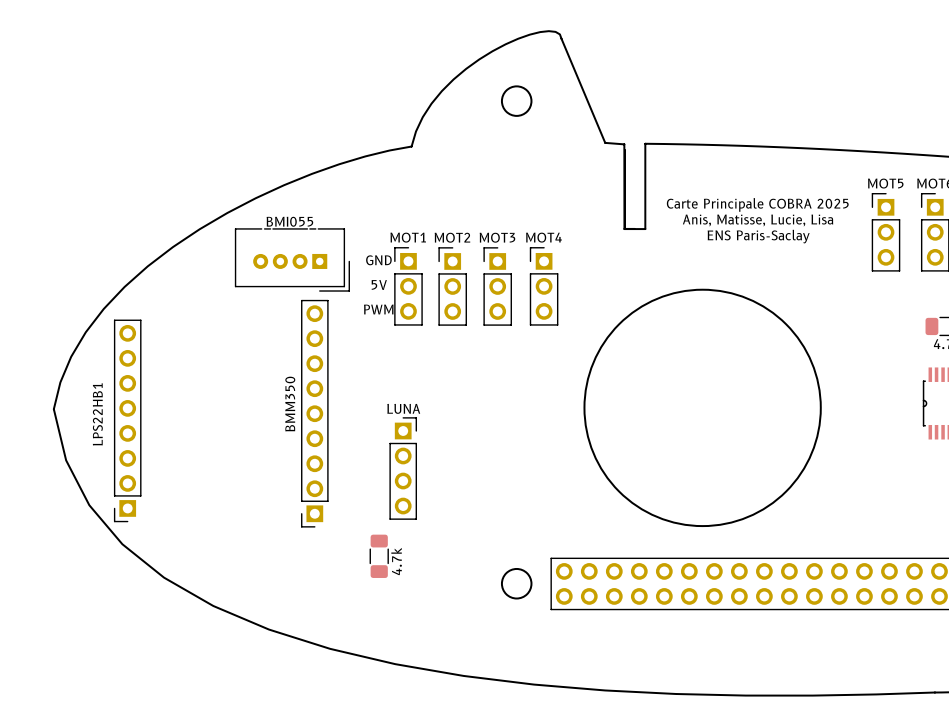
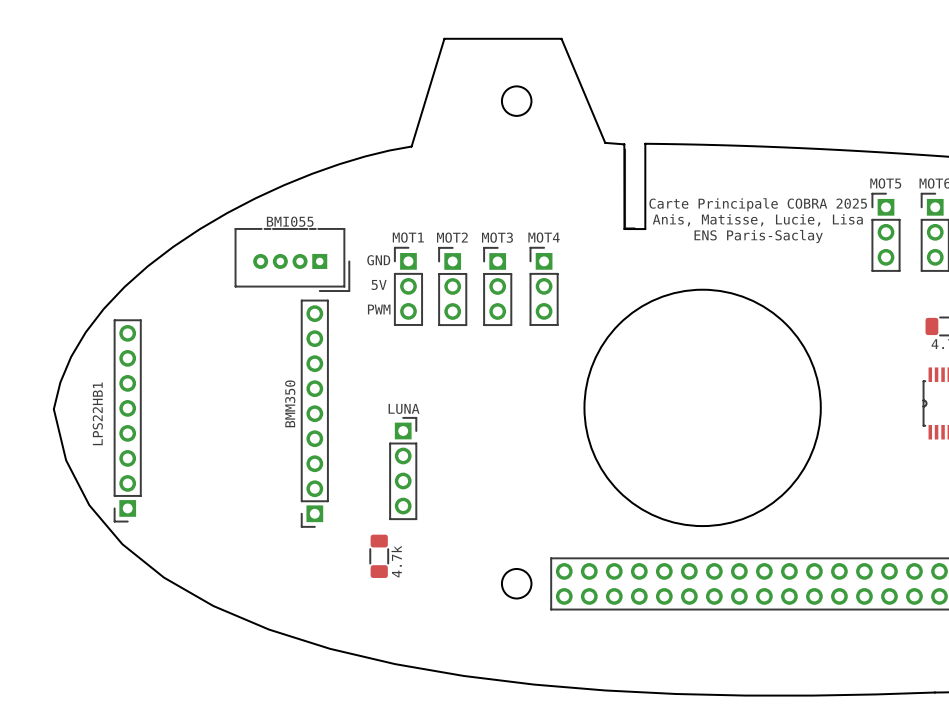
board edge: (561, 38) (559, 34) (555, 31) (529, 34) (505, 44) (479, 59) (453, 79) (431, 103) (416, 131) (411, 146) -> (561, 38) (444, 38) (411, 146)

